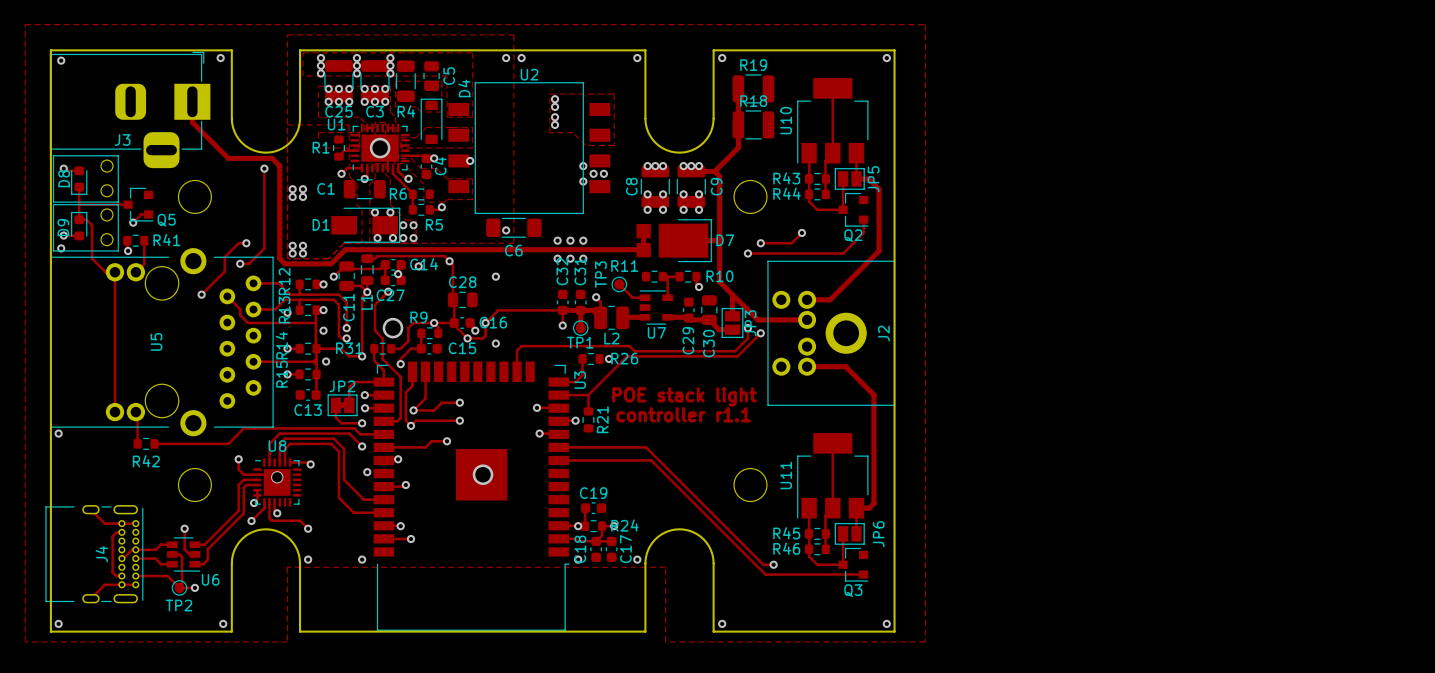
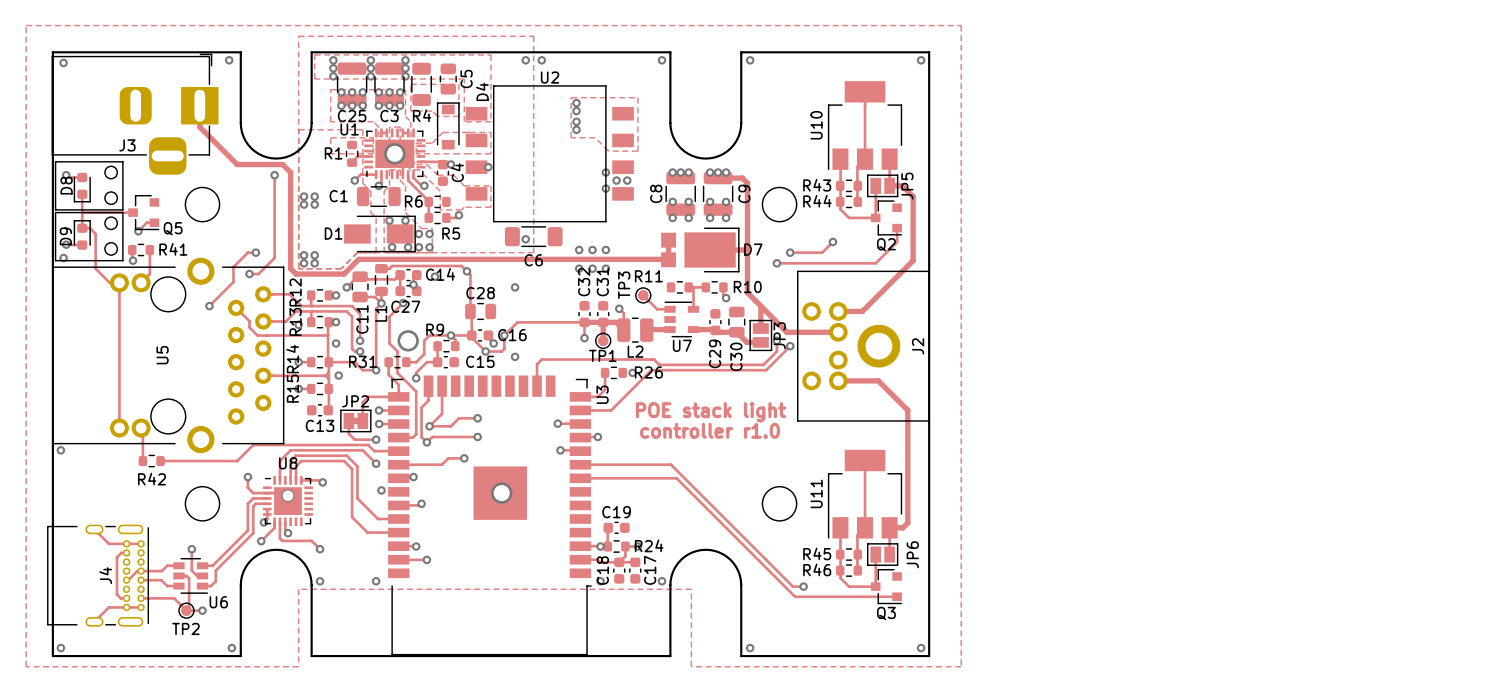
track: (738, 88) (738, 147) (714, 171) -> none
R19: (753, 88) -> none
R18: (753, 124) -> none
track: (588, 395) (588, 411) -> none
text: controller r1.1 (683, 414) -> controller r1.0 (710, 430)
R21: (588, 419) -> none

